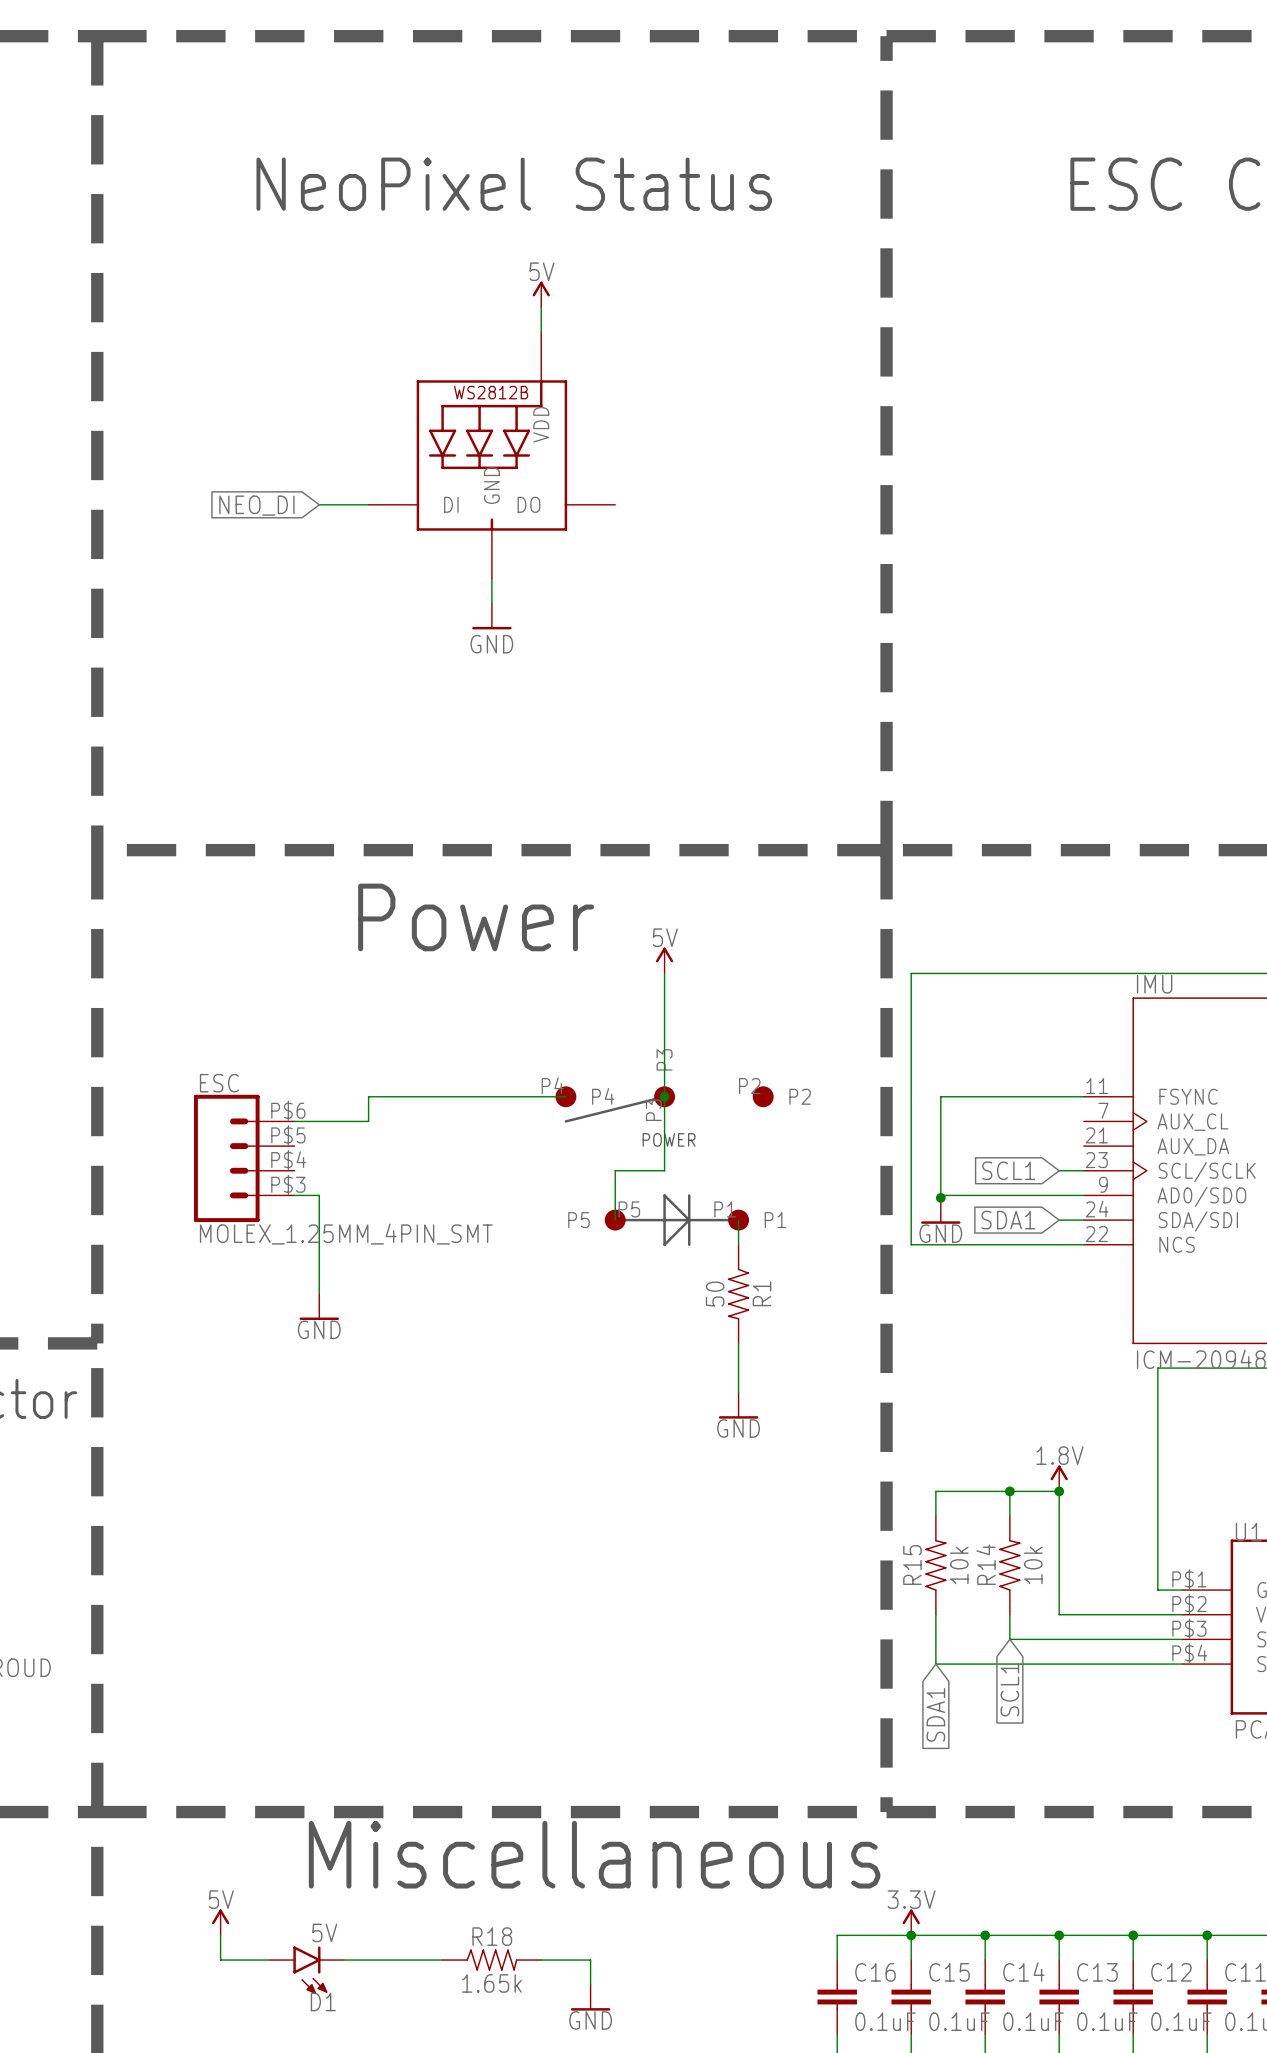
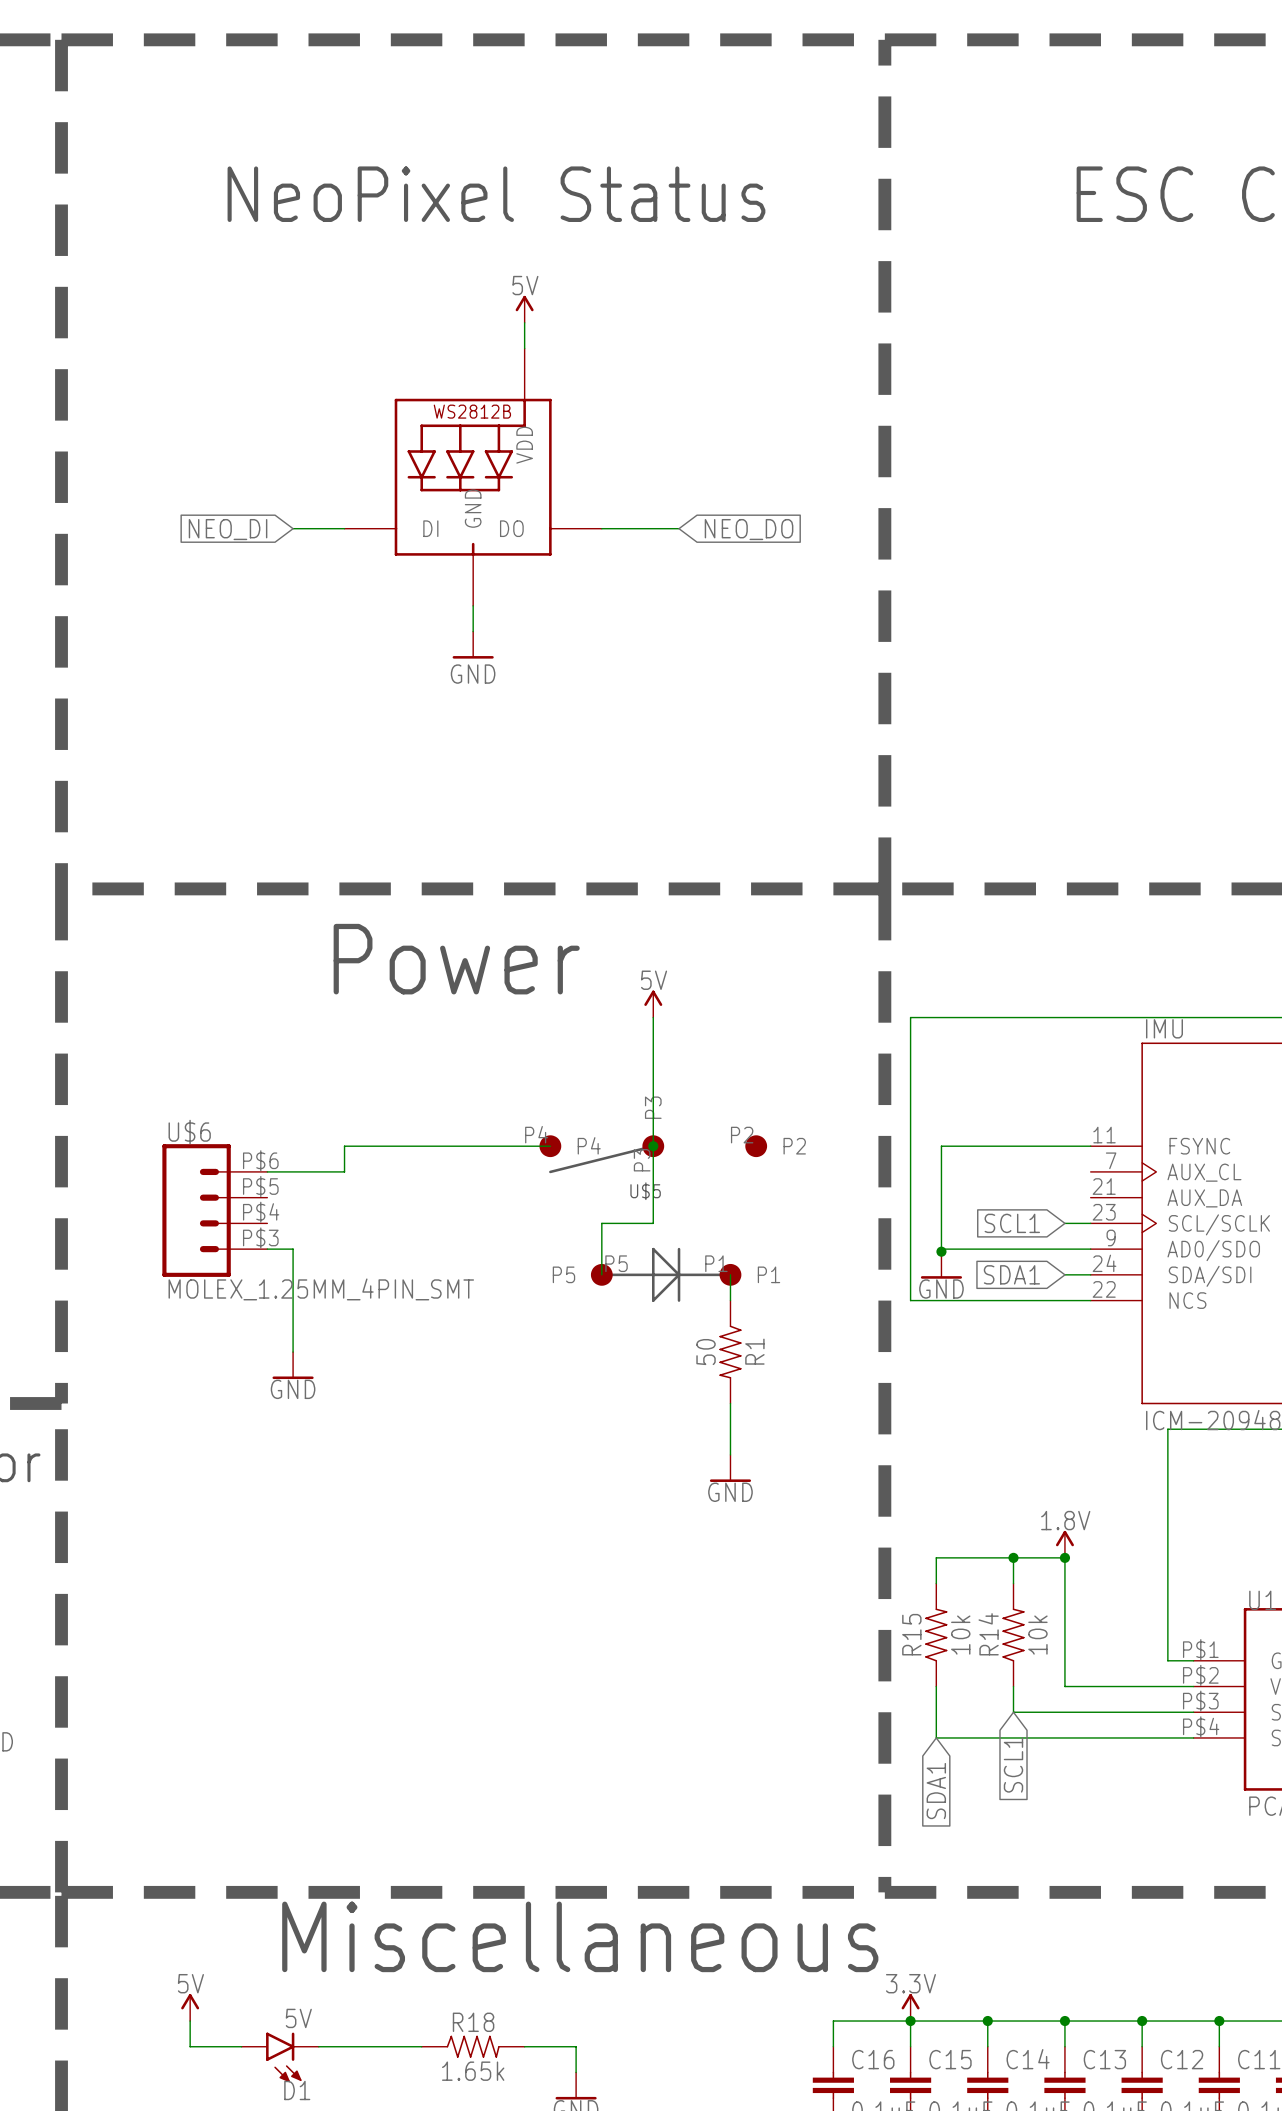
wire: none -> (601, 528) (679, 528)
global label: none -> NEO_DO (749, 529)
ESC name: ESC (219, 1083) -> U$6 (189, 1132)
POWER name: POWER (669, 1139) -> U$5 (645, 1191)

